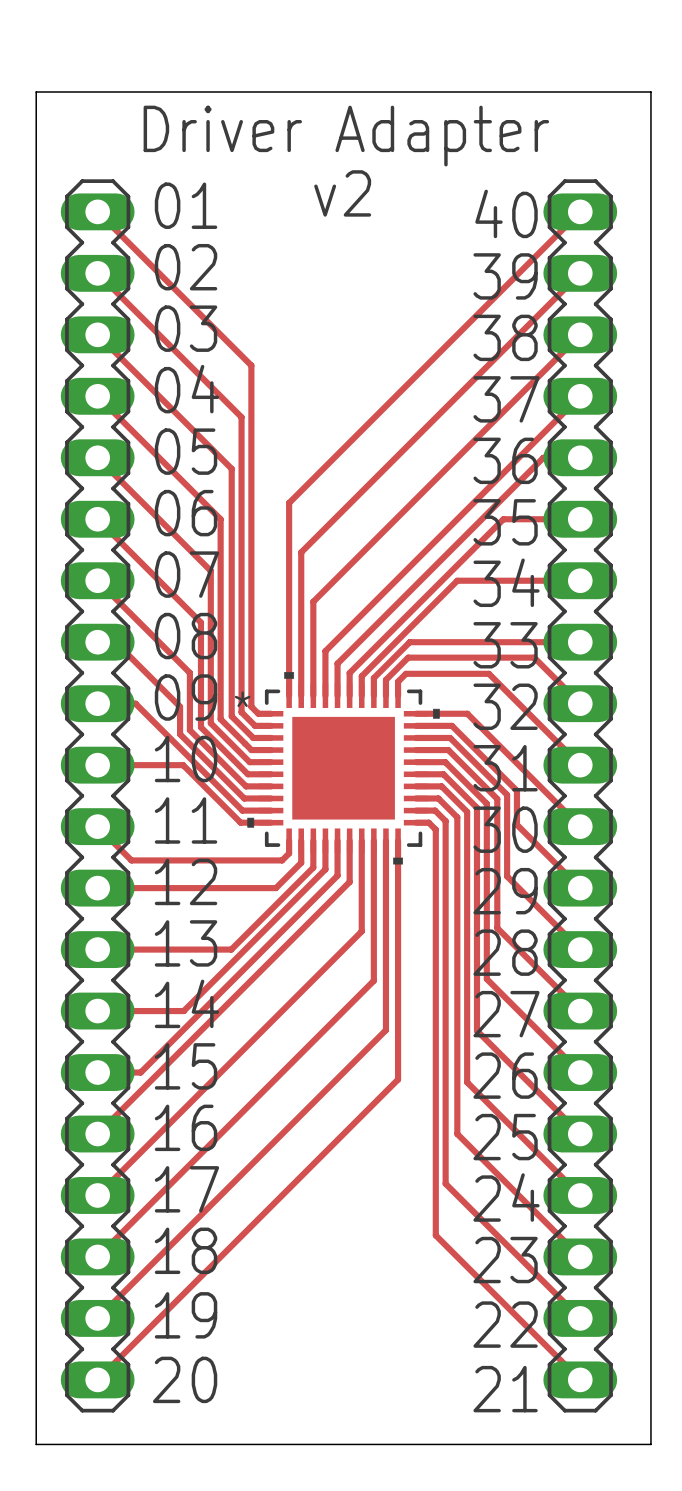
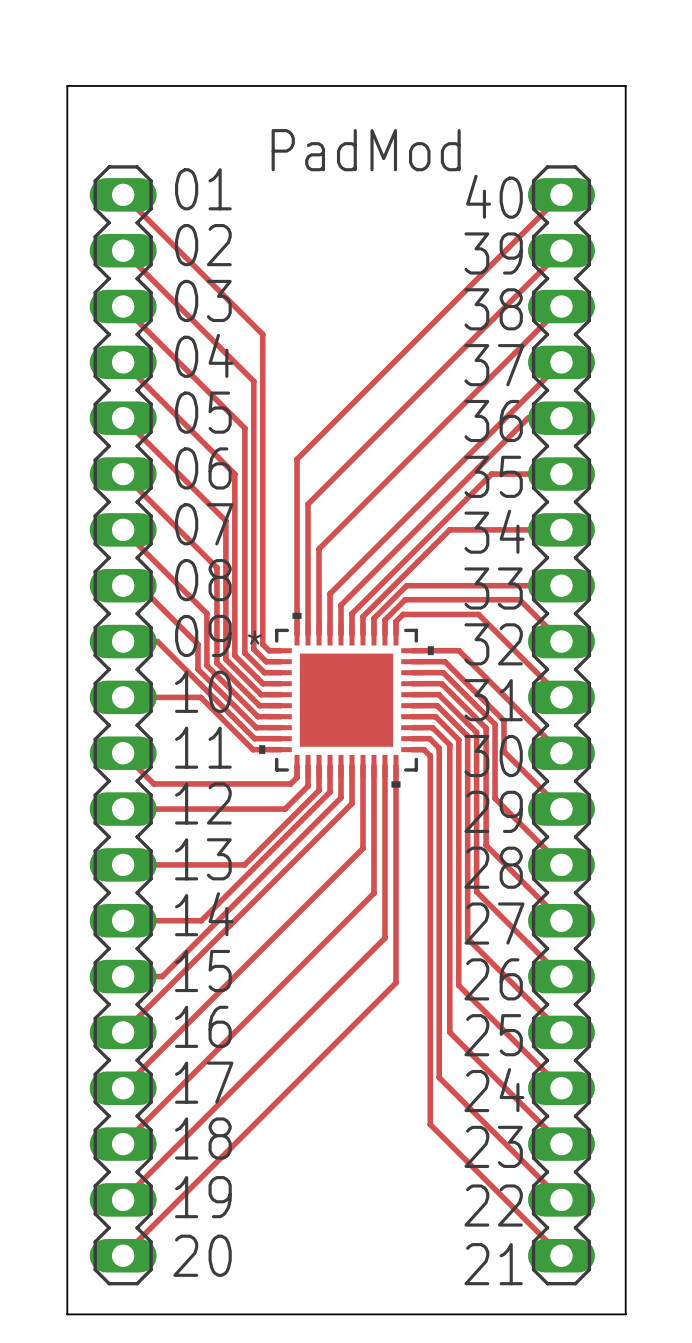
text: Driver Adapter (346, 136) -> none
text: none -> PadMod (366, 150)
text: v2 (342, 193) -> none

